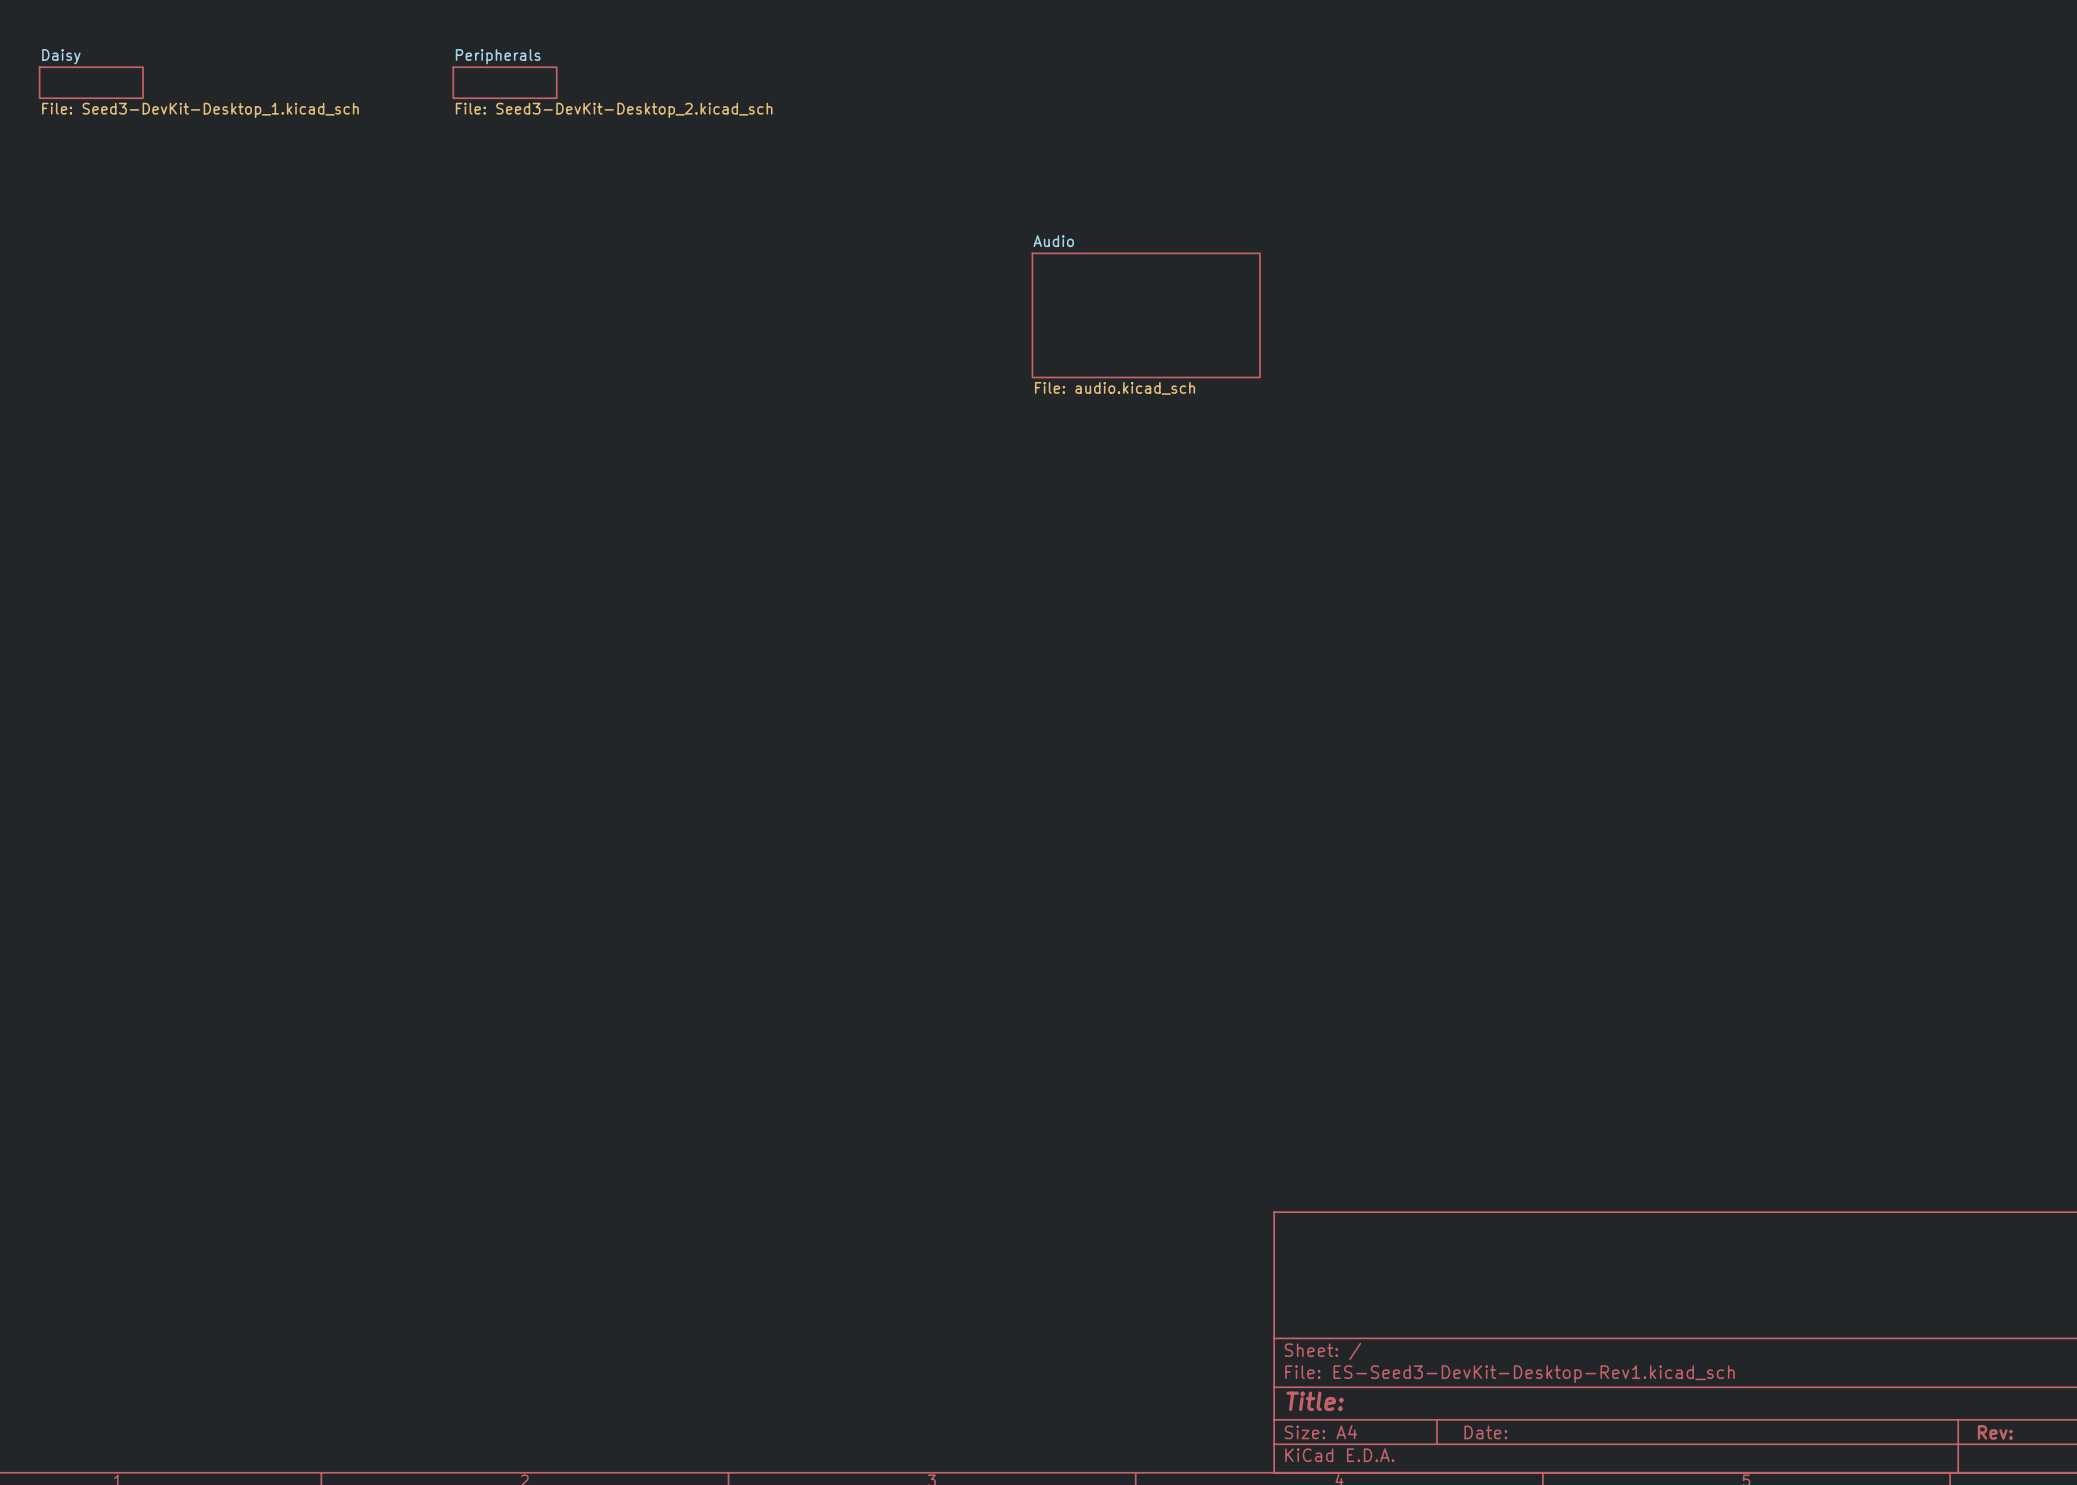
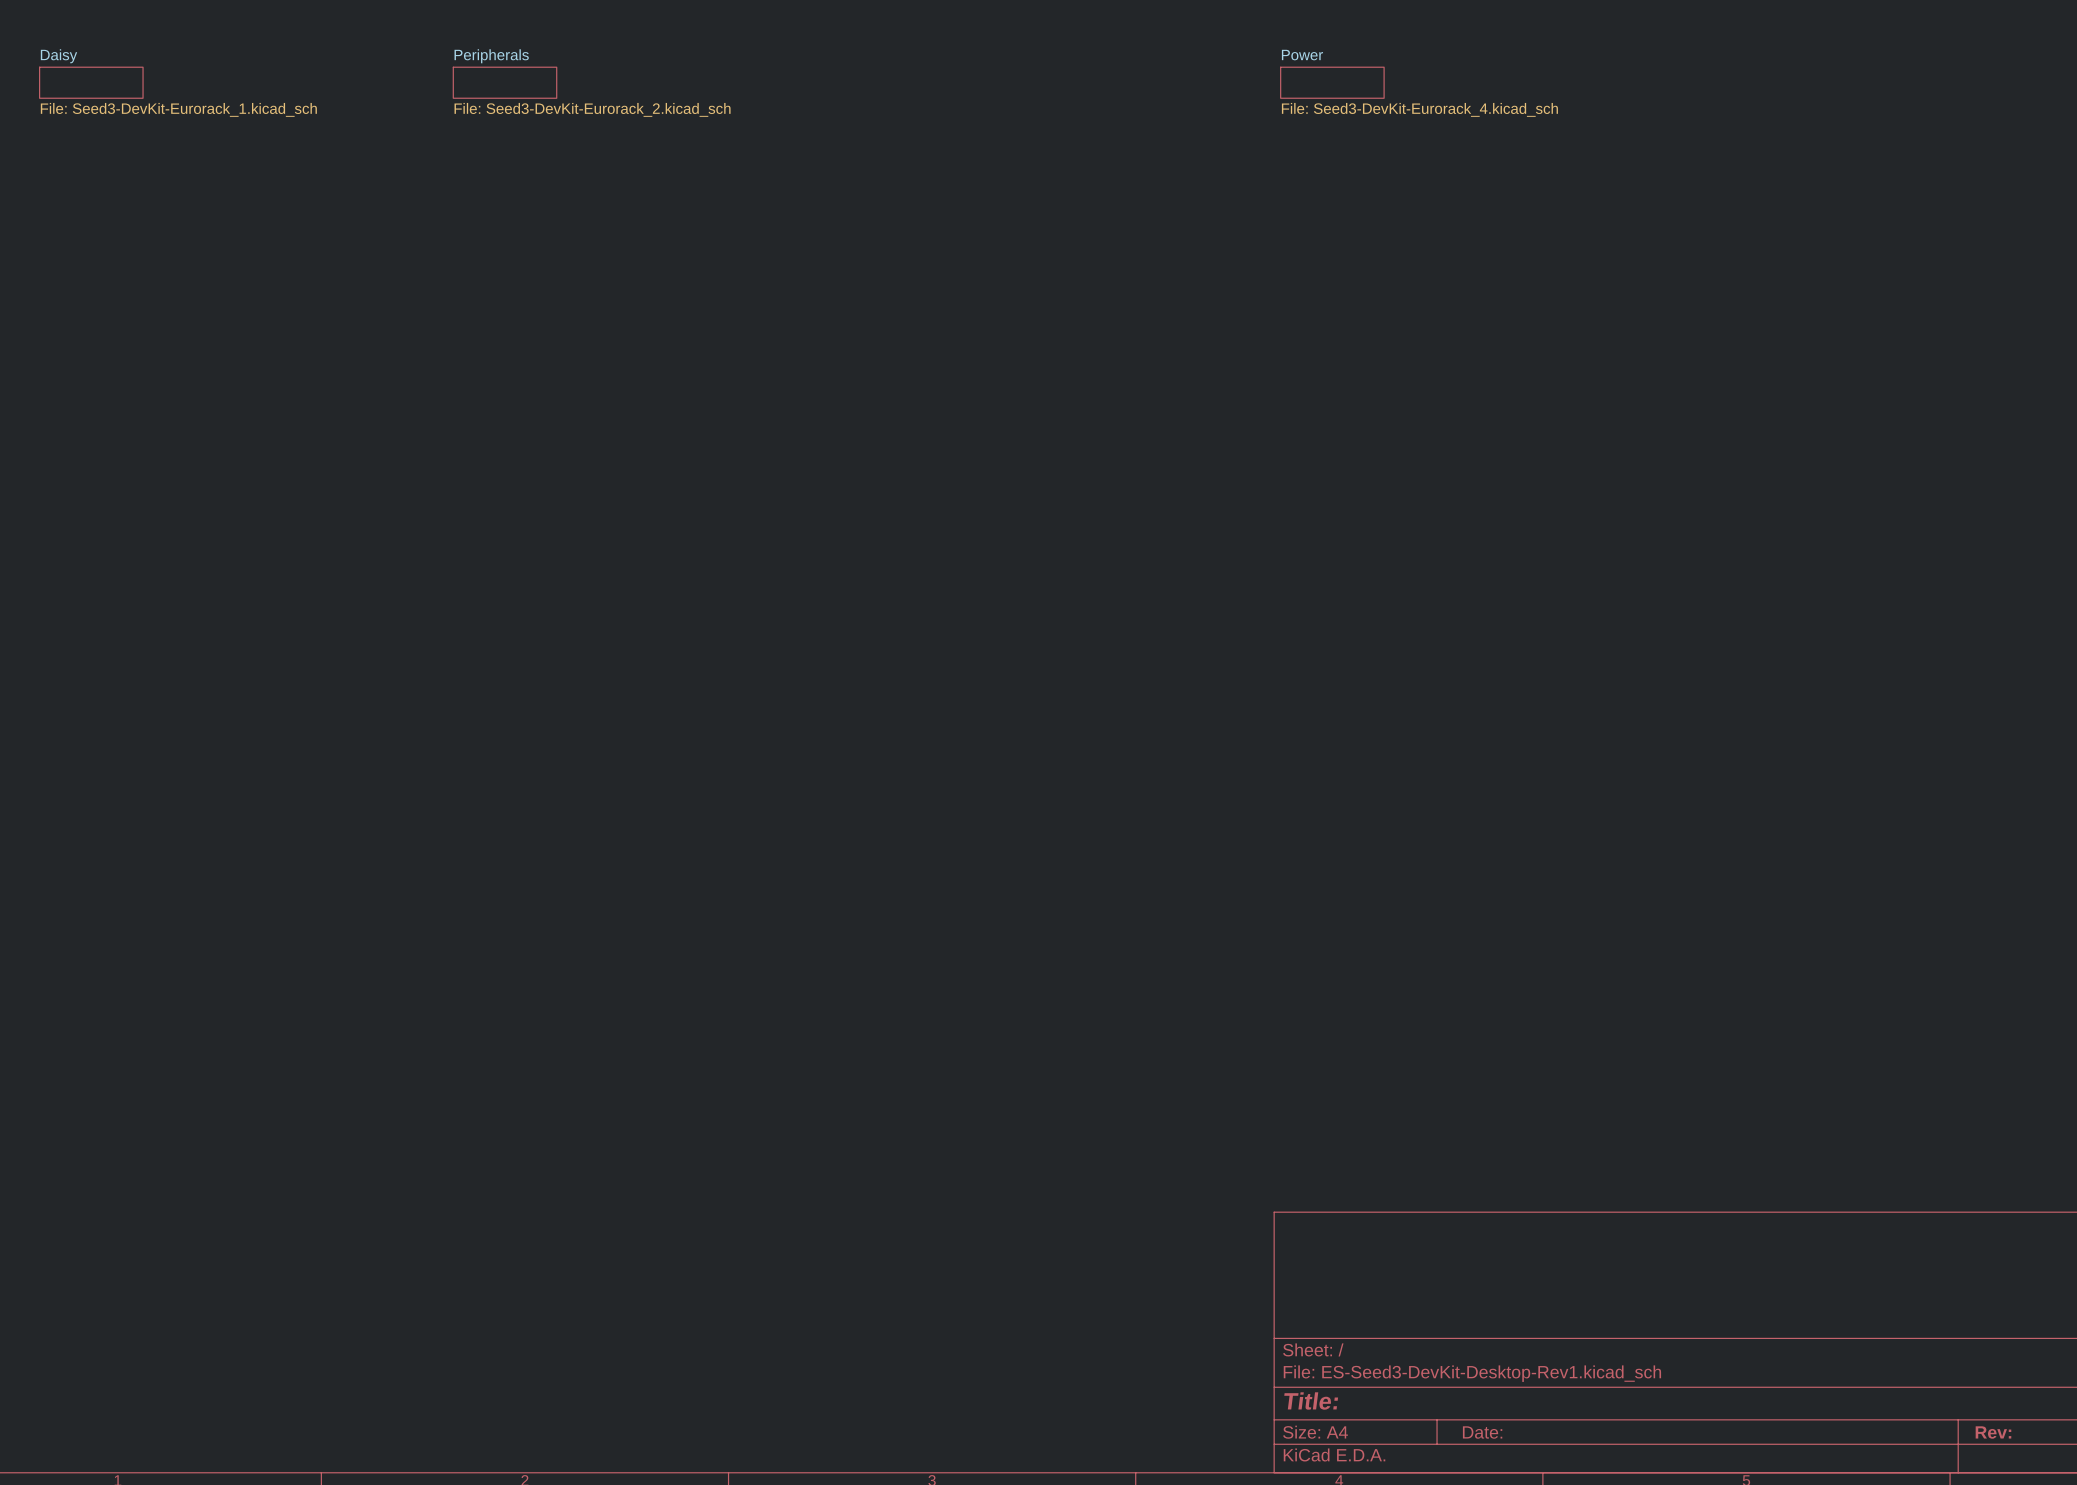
sheet Power: none -> File: Seed3-DevKit-Eurorack_4.kicad_sch (1332, 82)
sheet Daisy value: File: Seed3-DevKit-Desktop_1.kicad_sch (200, 110) -> File: Seed3-DevKit-Eurorack_1.kicad_sch (178, 109)
sheet Peripherals value: File: Seed3-DevKit-Desktop_2.kicad_sch (614, 110) -> File: Seed3-DevKit-Eurorack_2.kicad_sch (592, 109)
sheet Audio: File: audio.kicad_sch (1146, 315) -> none

